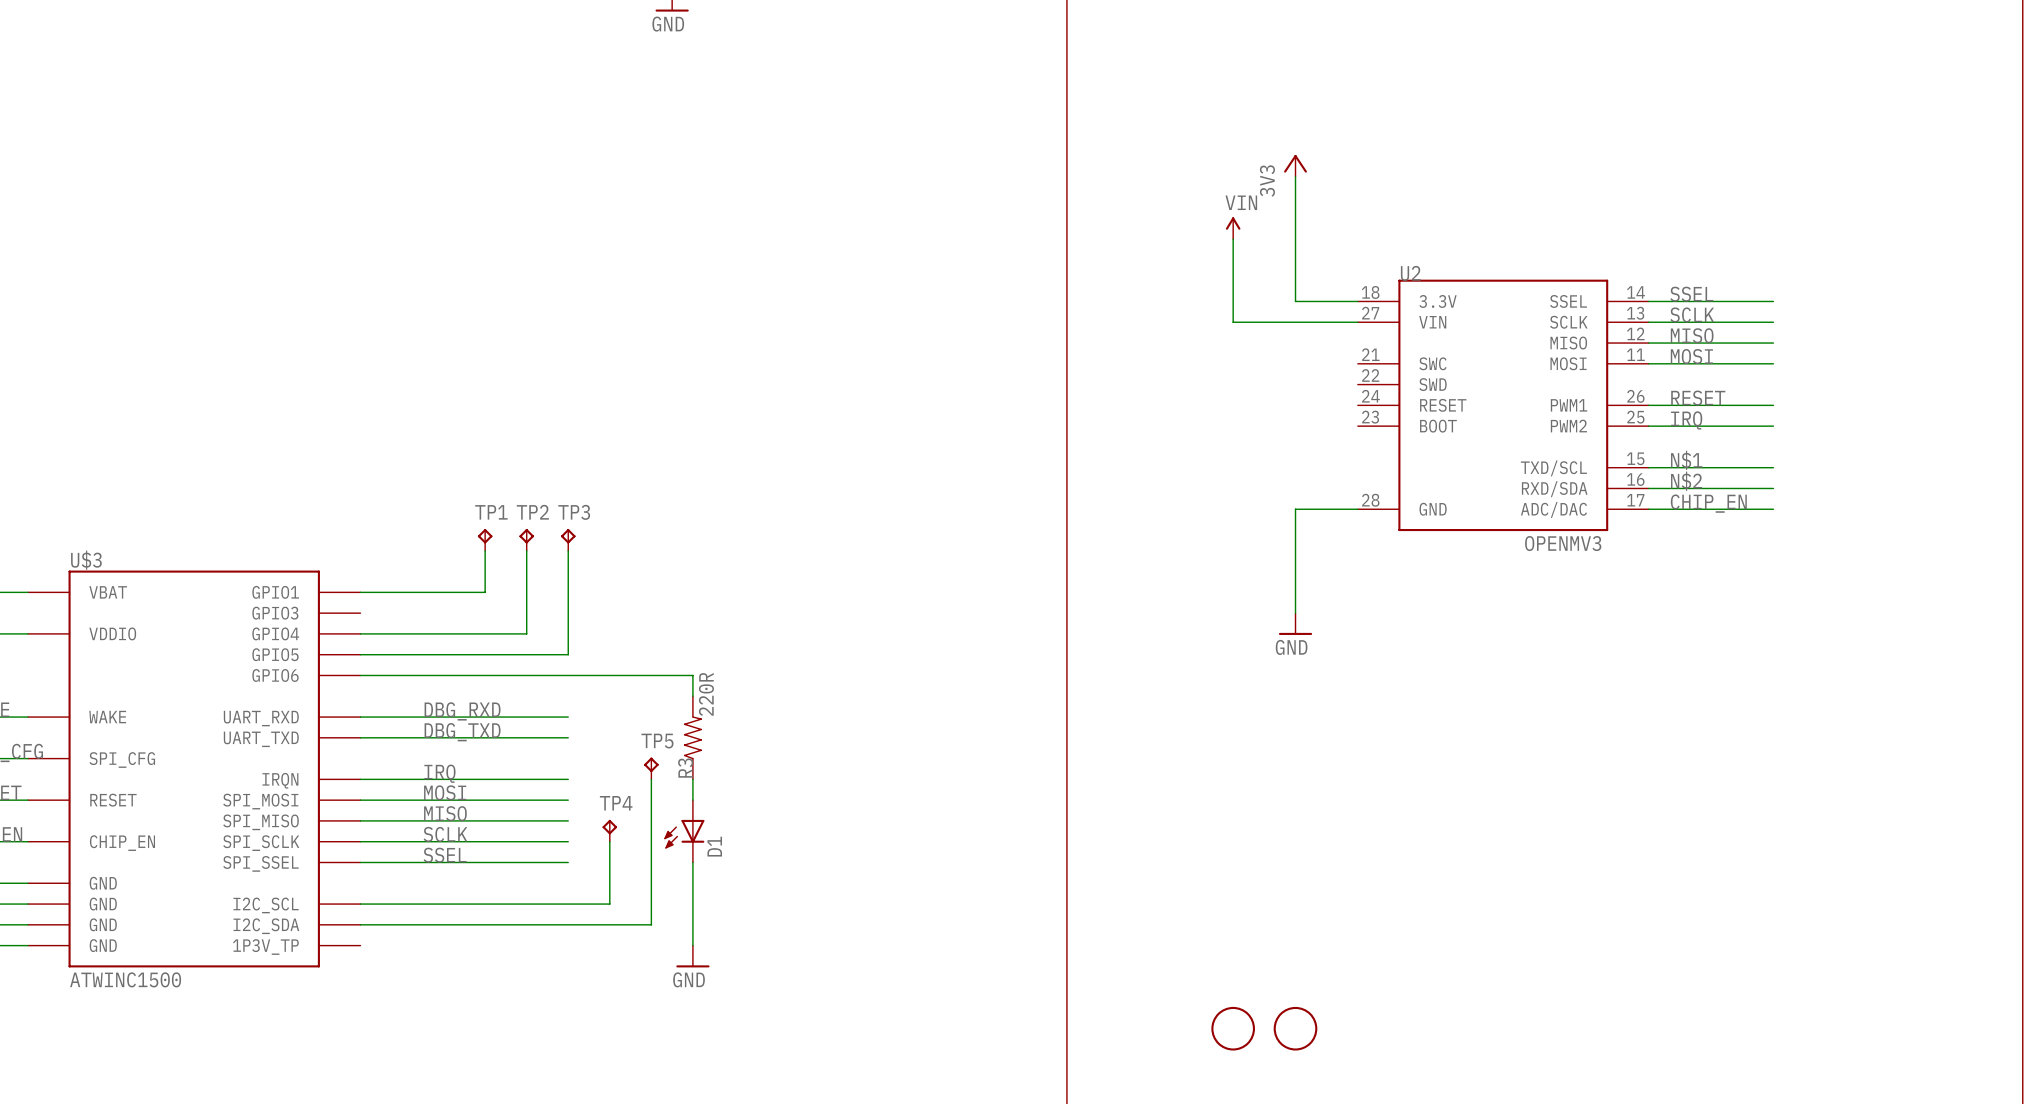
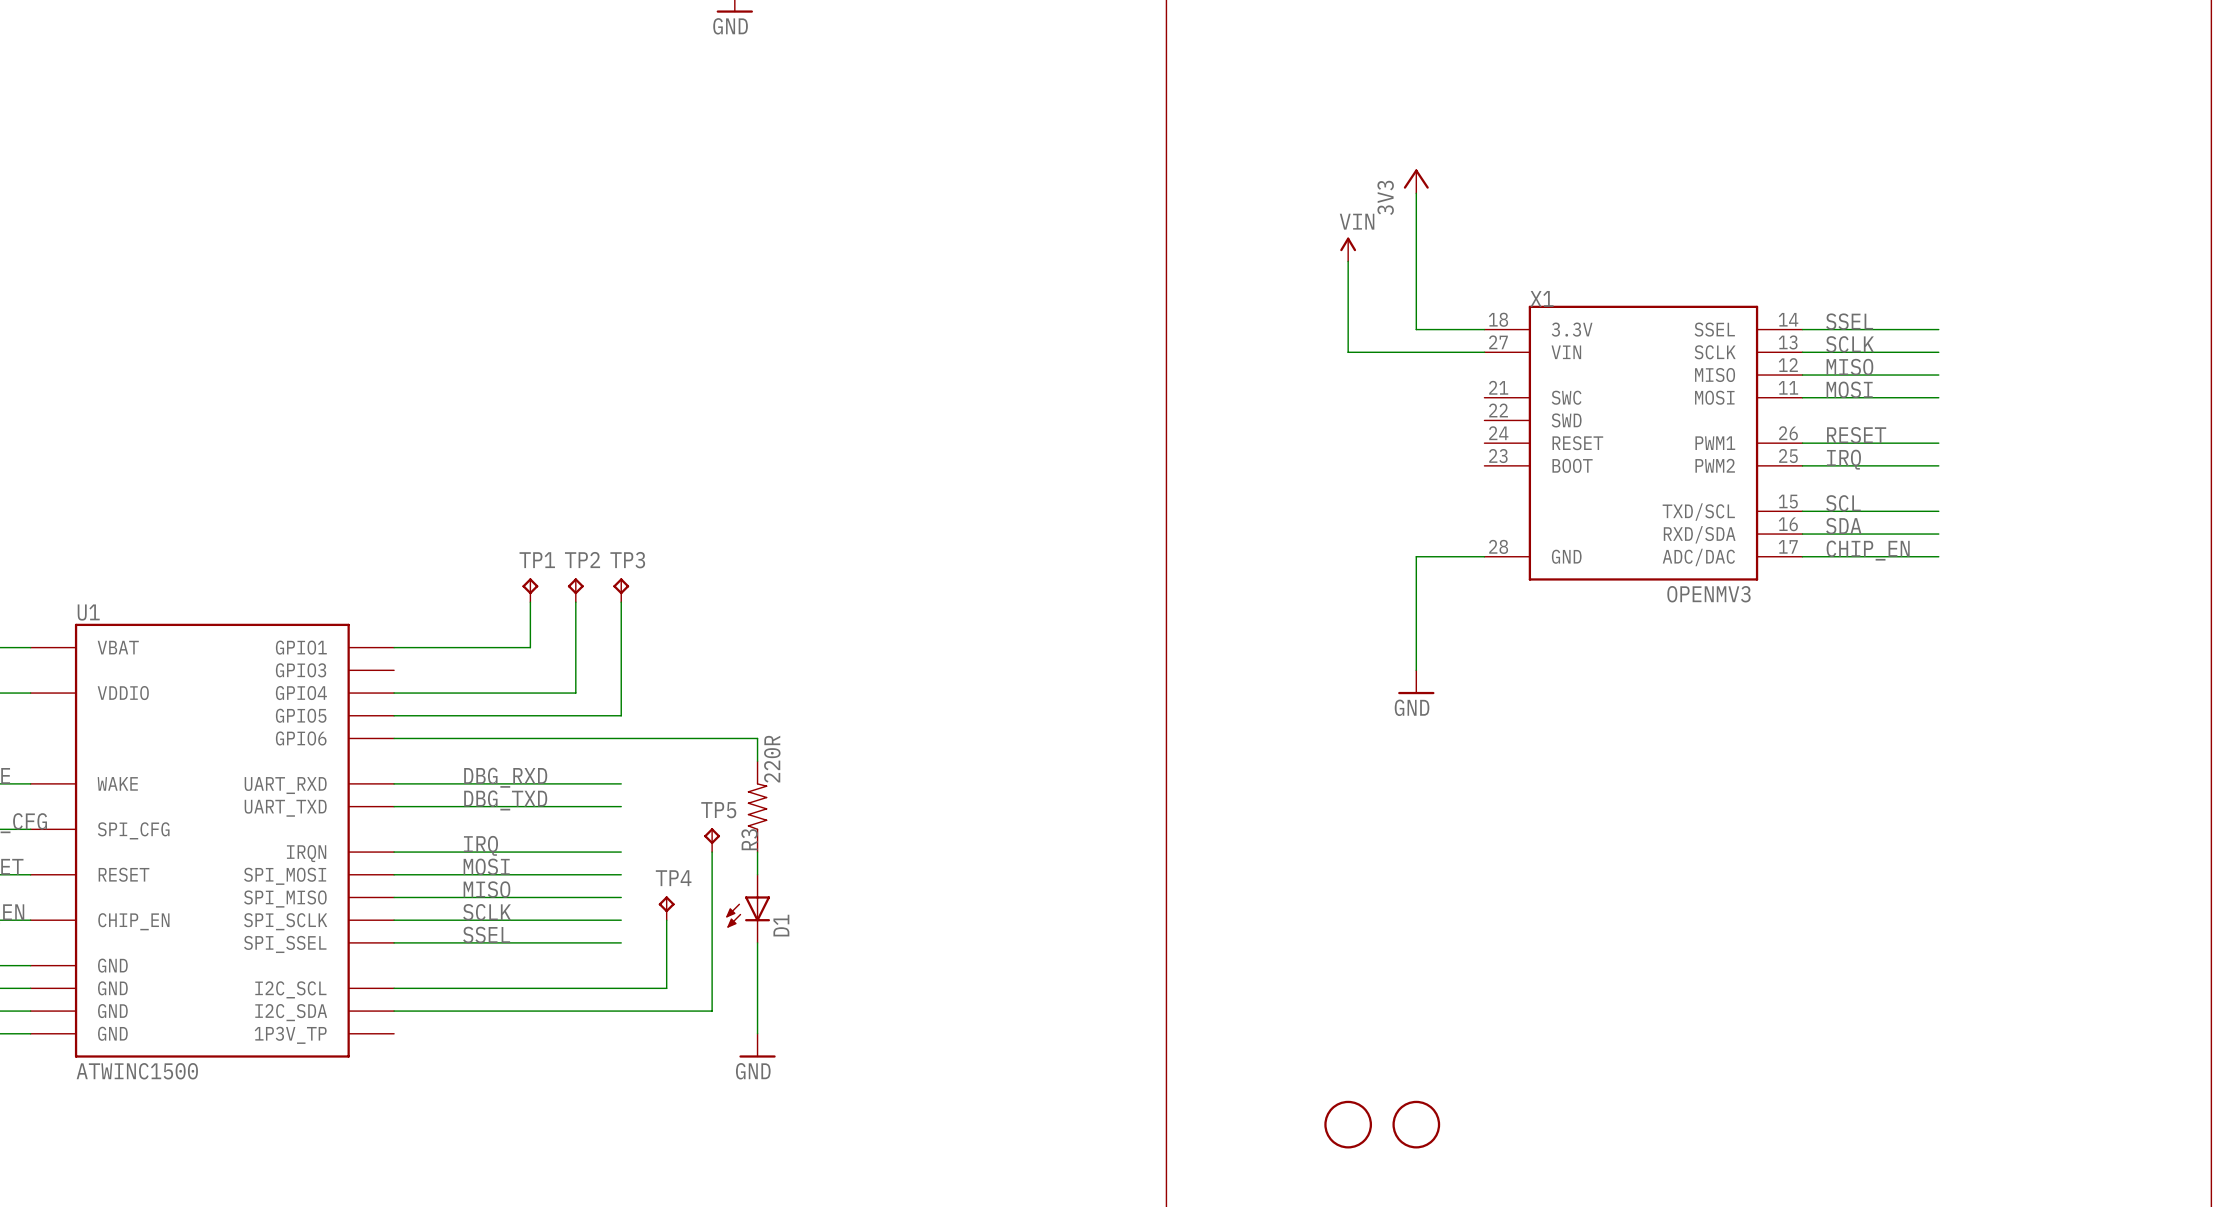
U2 name: U2 (1410, 273) -> X1 (1541, 298)
label: N$1 (1686, 460) -> SCL (1843, 503)
label: N$2 (1686, 481) -> SDA (1843, 526)
U$3 name: U$3 (86, 560) -> U1 (88, 612)

